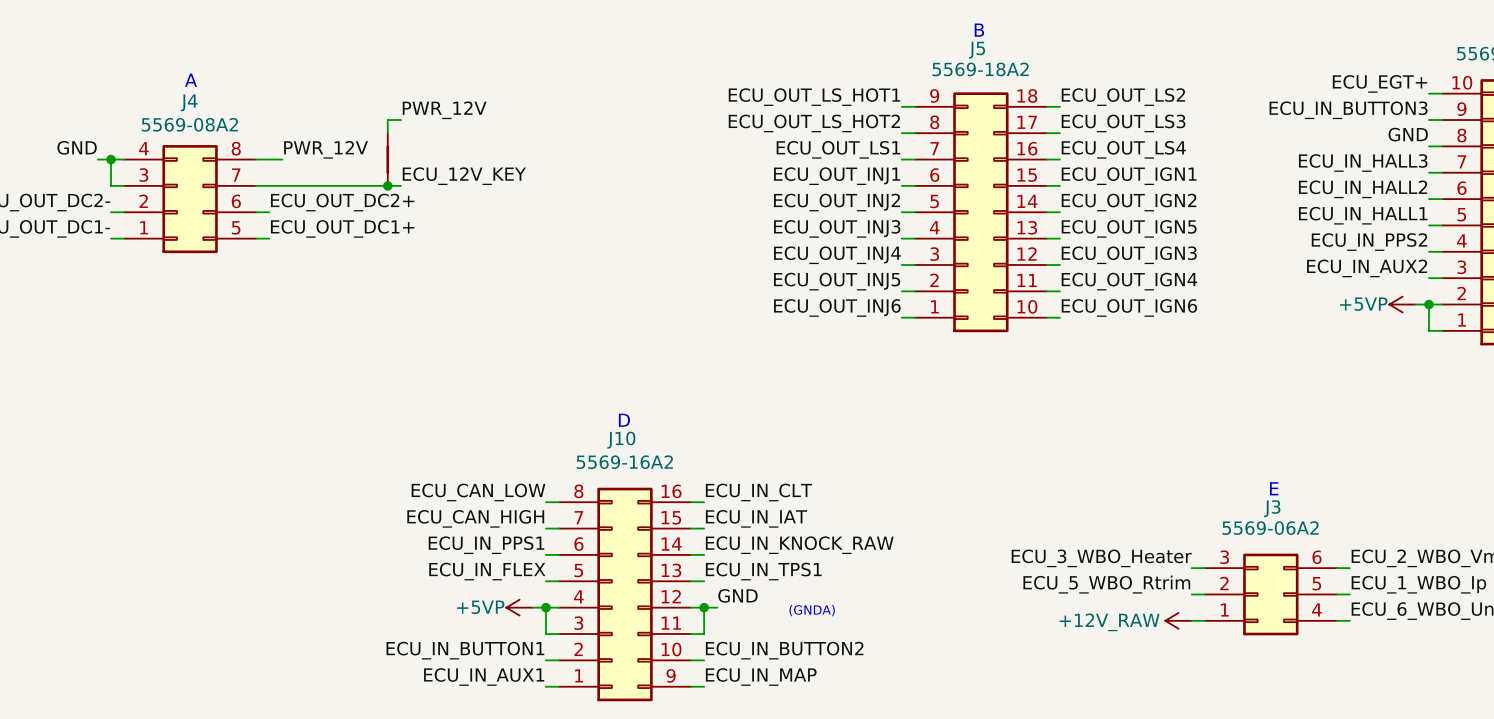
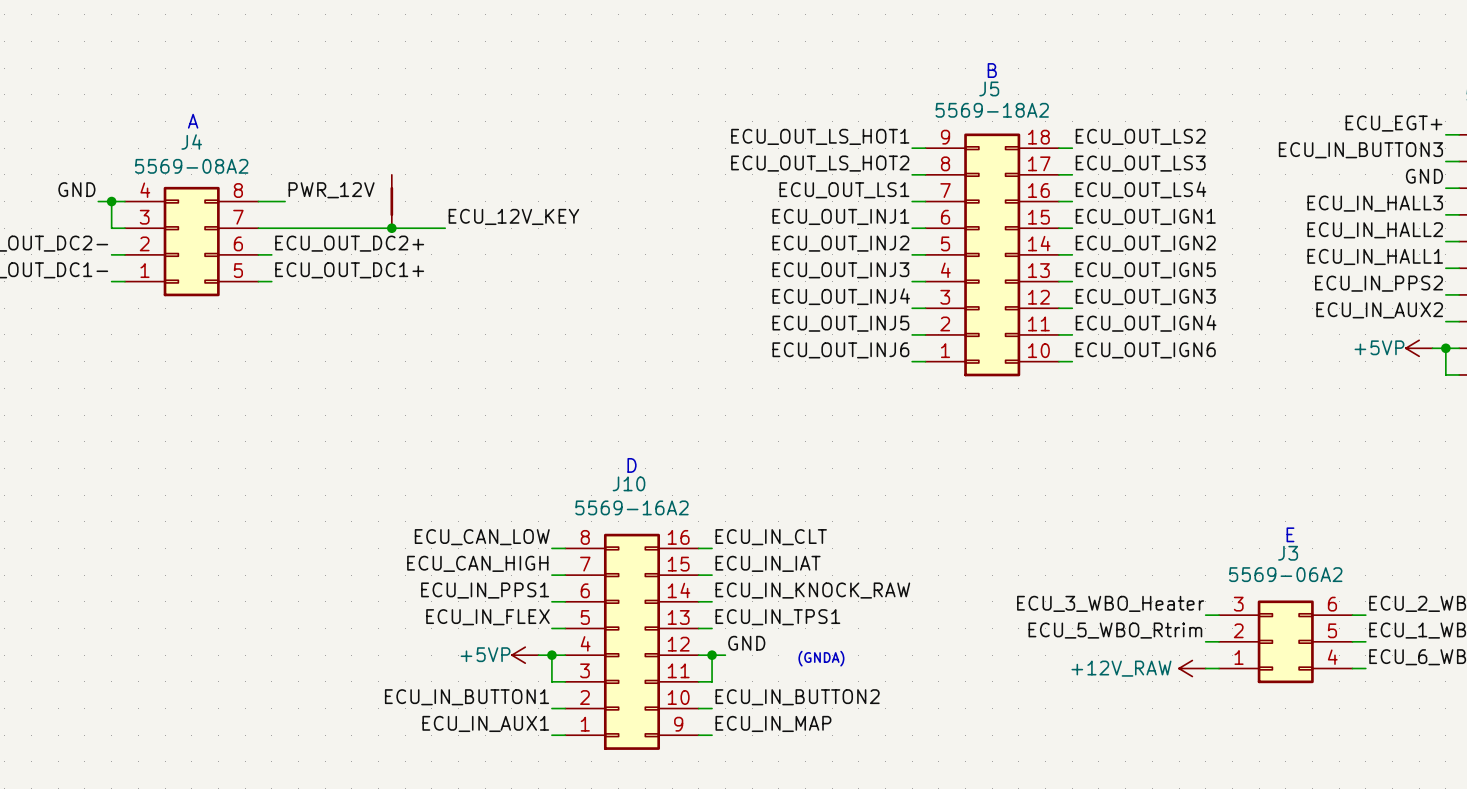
label: PWR_12V (444, 110) -> none
wire: (400, 120) (387, 120) (387, 133) -> none
label position: ECU_12V_KEY (464, 176) -> ECU_12V_KEY (513, 216)
wire: none -> (405, 228) (445, 228)

